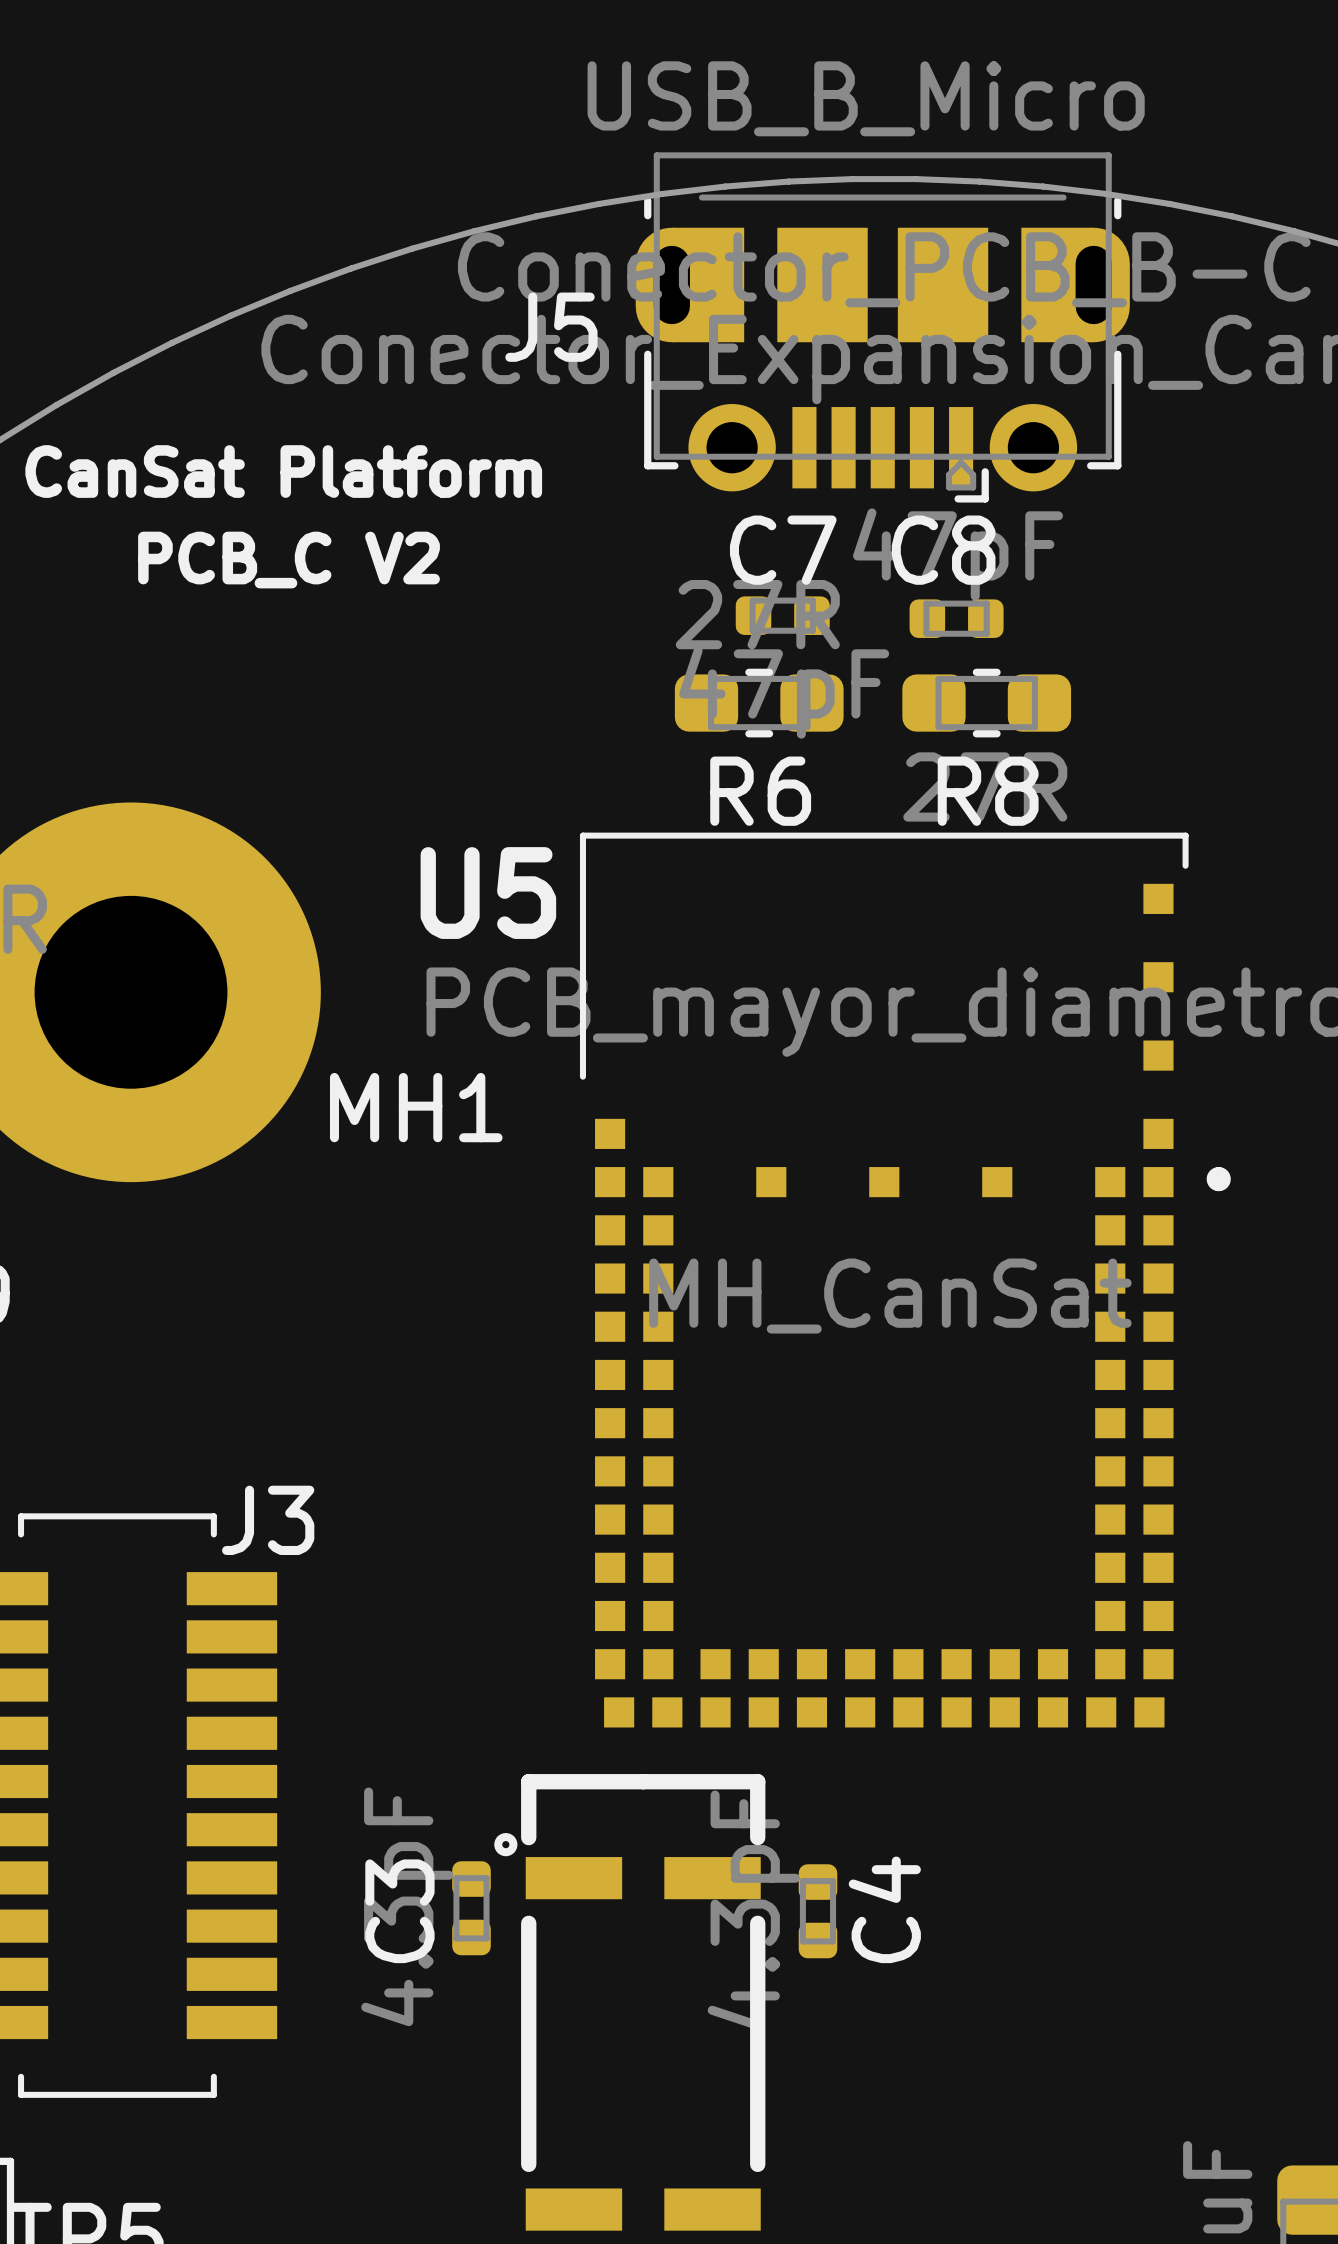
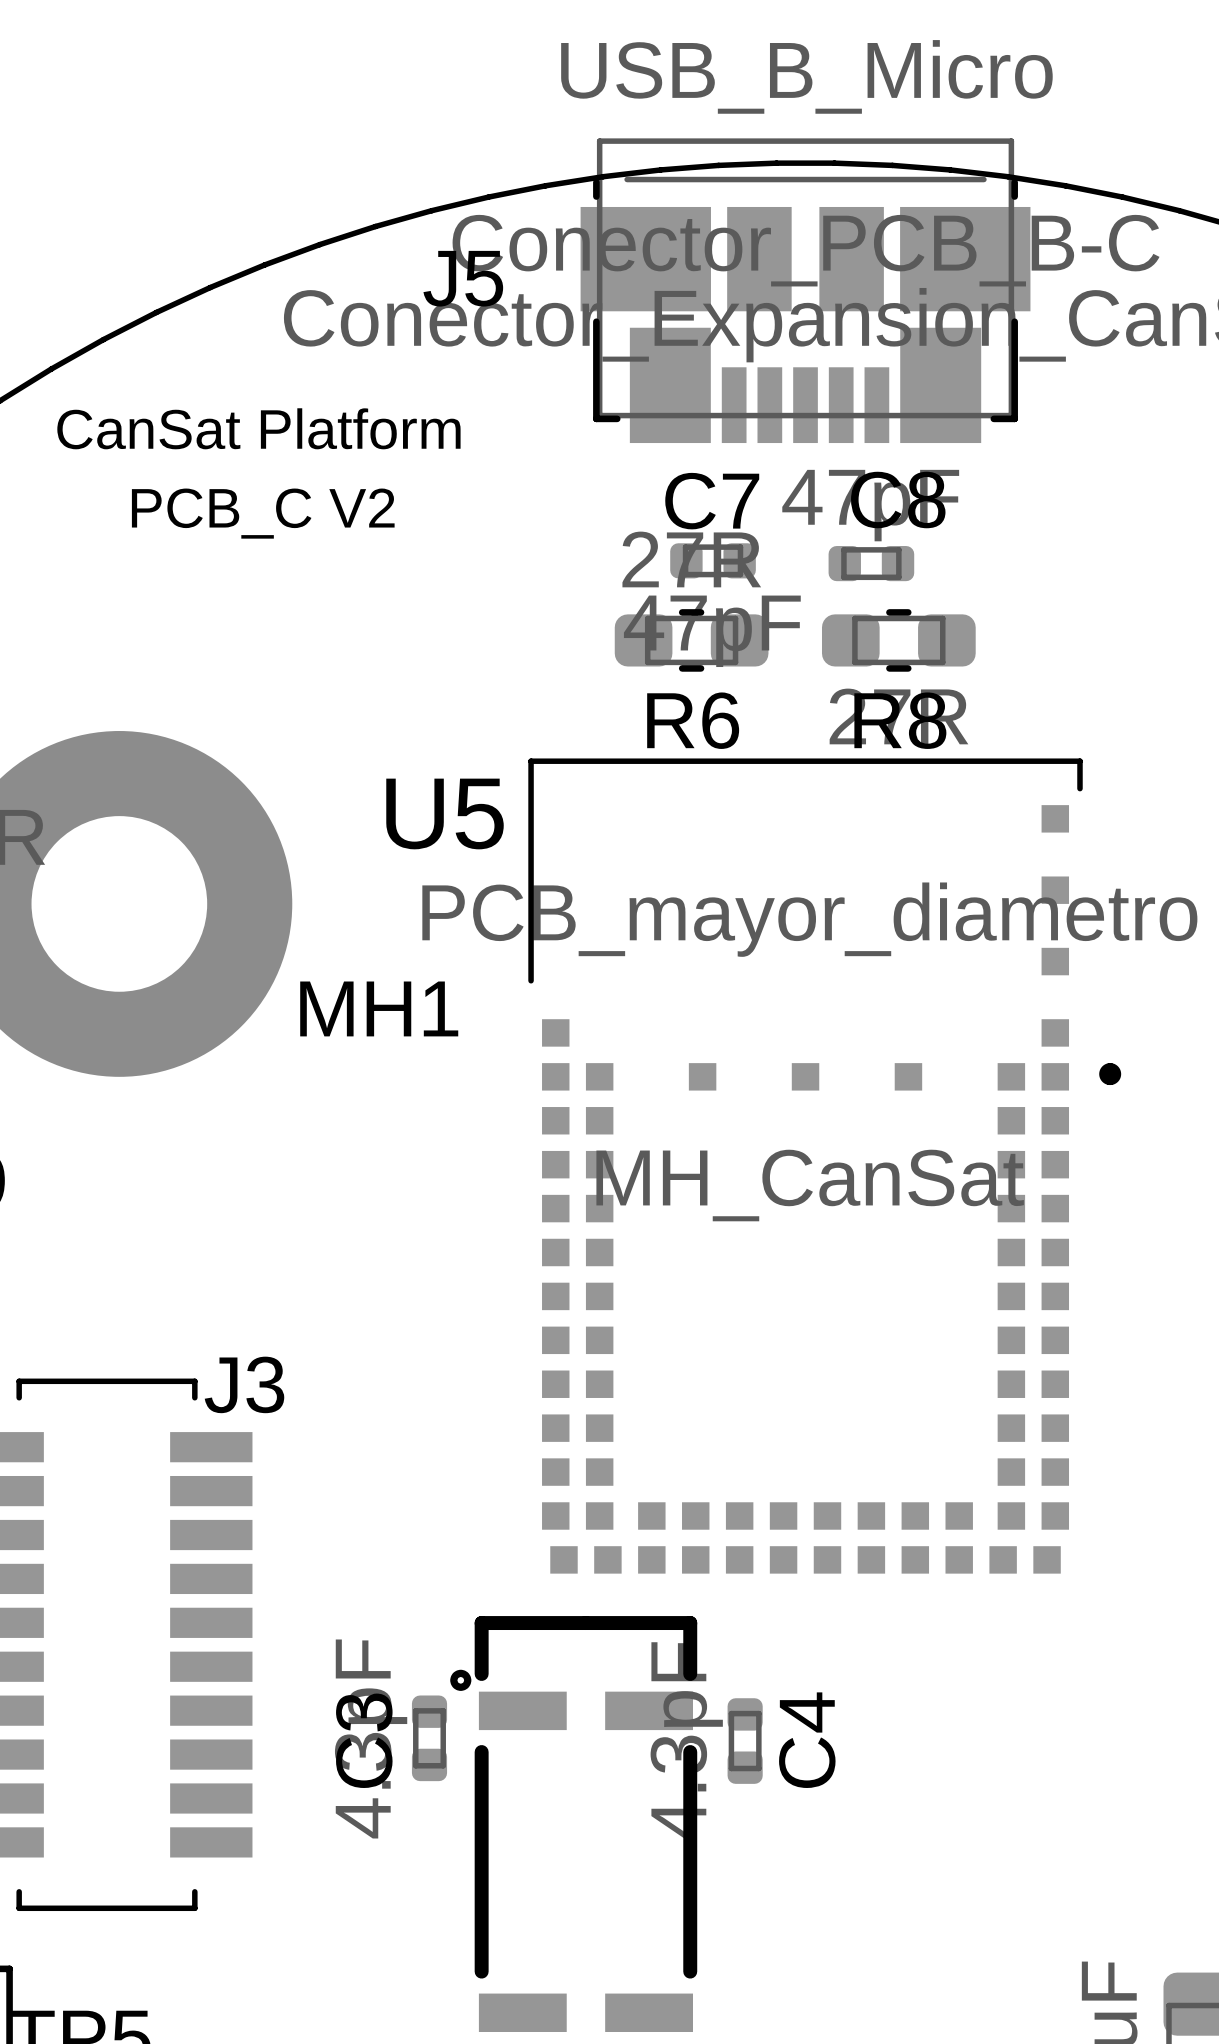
J5 footprint: [635, 152, 1130, 503] -> [580, 138, 1031, 444]
C8 name position: C8 (943, 550) -> C8 (898, 500)

